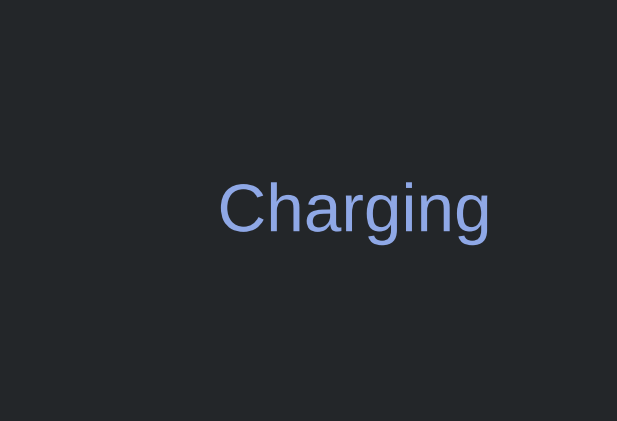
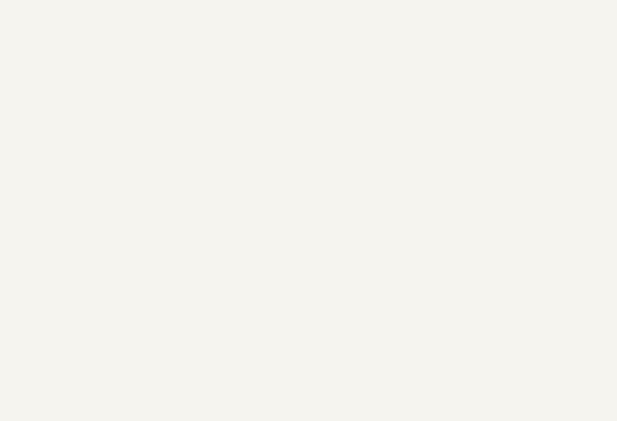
text: Charging (354, 213) -> none

